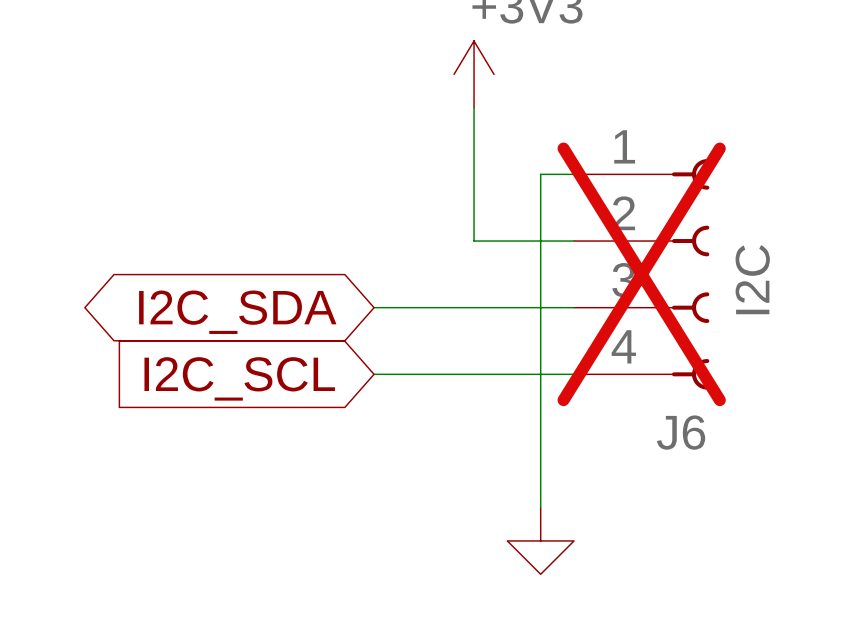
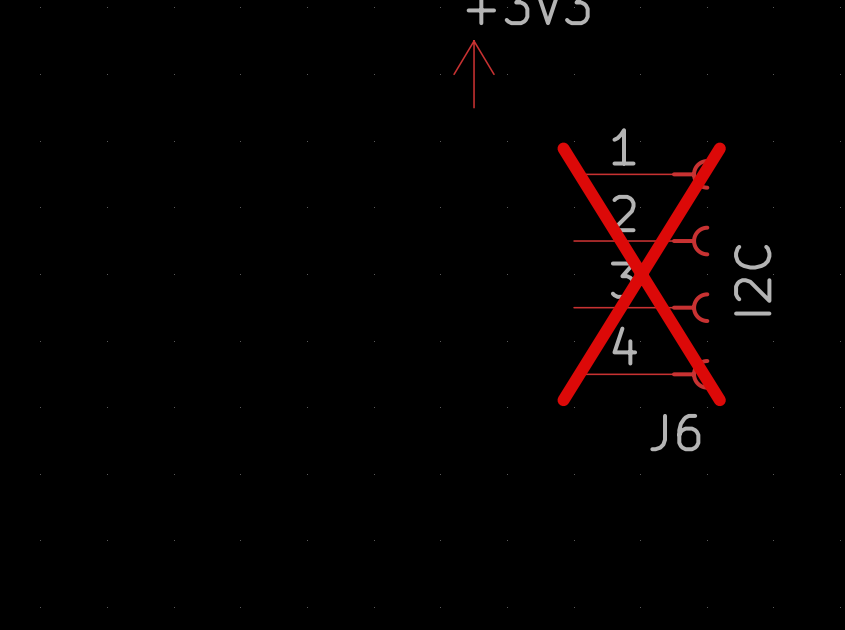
wire: (474, 107) (474, 241) (574, 241) -> none
wire: (574, 174) (540, 174) (540, 507) -> none
wire: (374, 307) (574, 307) -> none
global label: I2C_SDA (237, 312) -> none
wire: (374, 374) (574, 374) -> none
global label: I2C_SCL (239, 378) -> none
power symbol: (540, 540) -> none

